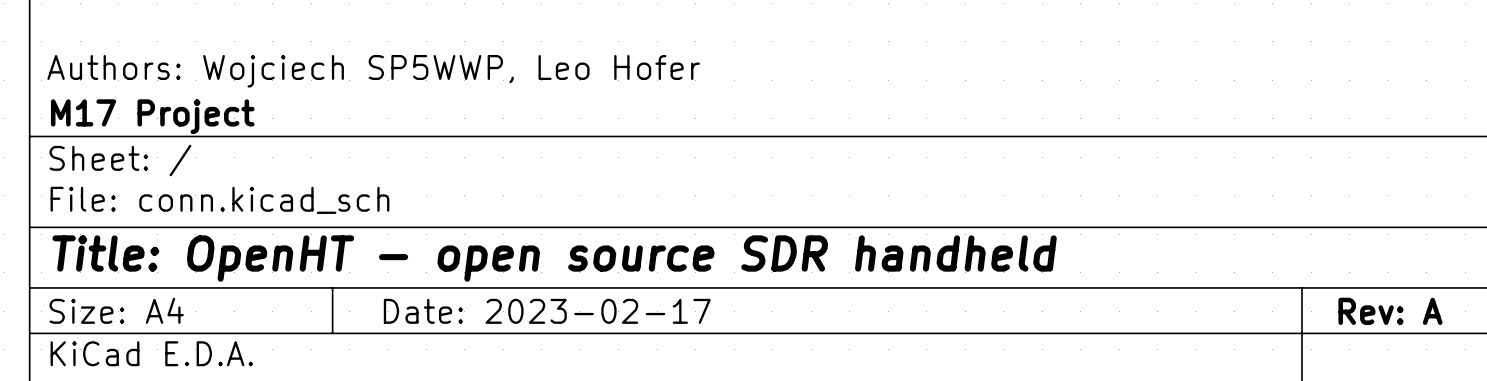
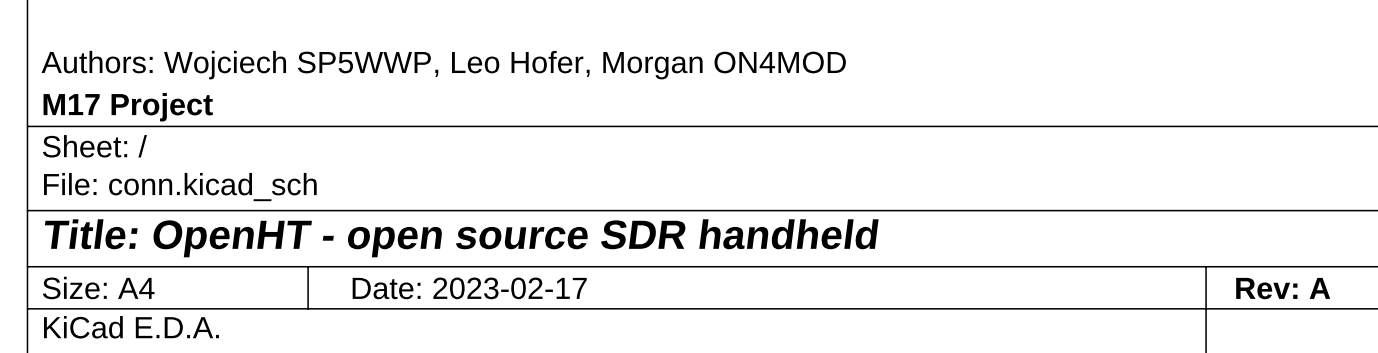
title block: Authors: Wojciech SP5WWP, Leo Hofer (373, 71) -> Authors: Wojciech SP5WWP, Leo Hofer, Morgan ON4MOD (443, 65)

